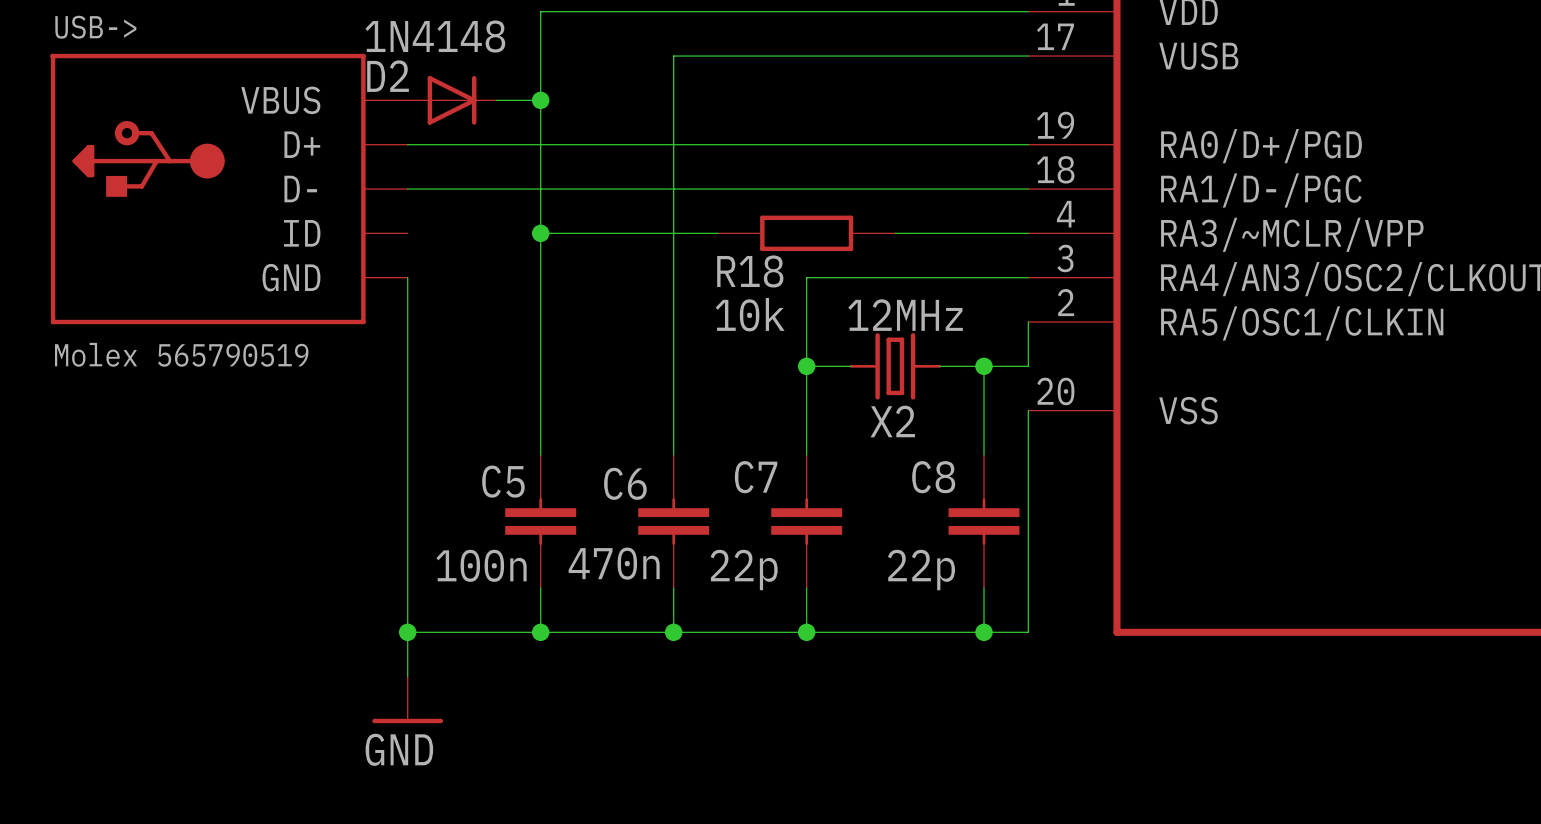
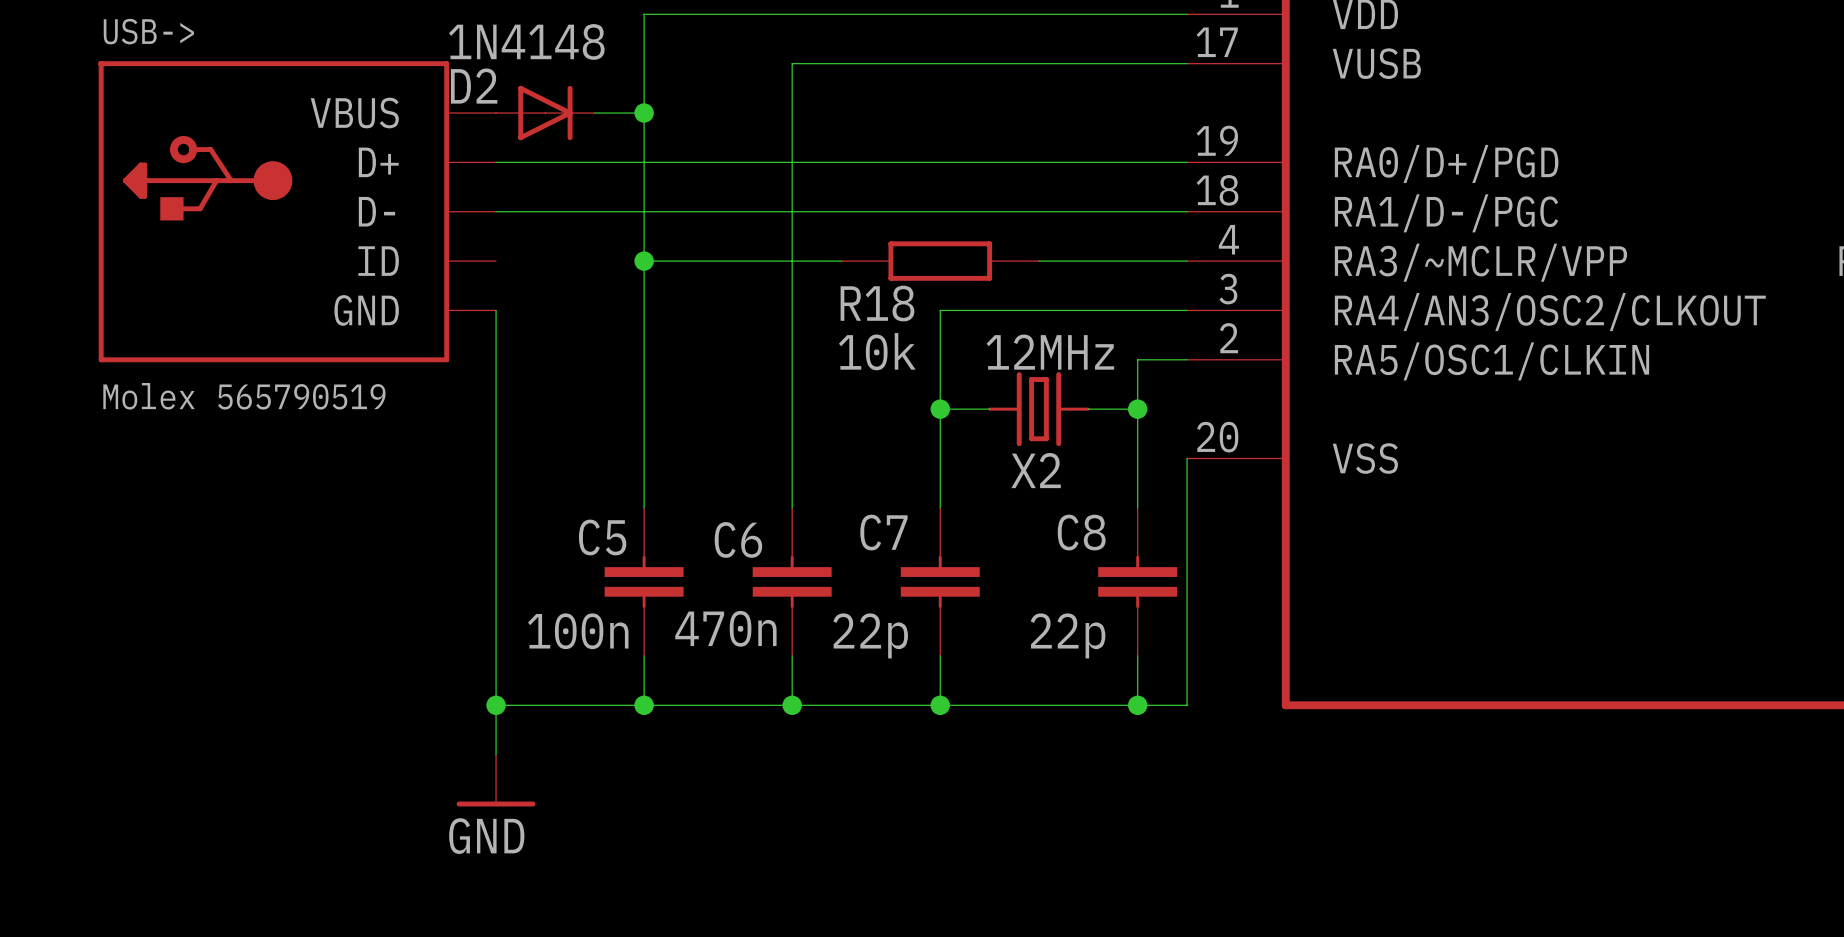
wire: (1028, 322) (1028, 366) (983, 366) -> (1187, 359) (1137, 359) (1137, 409)

